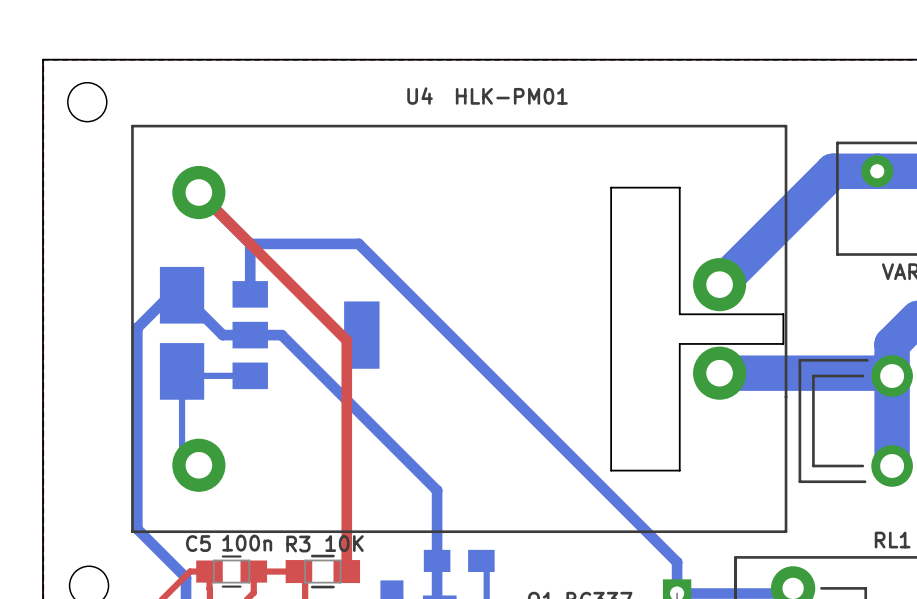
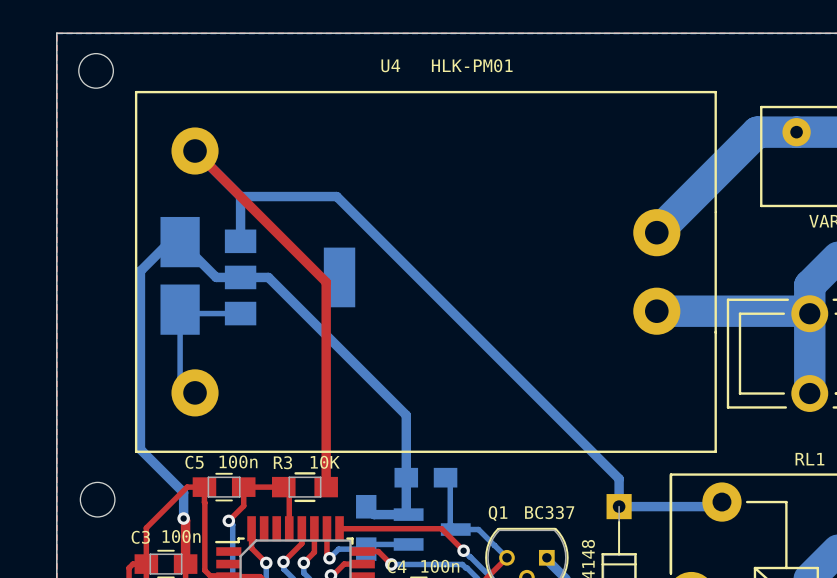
board edge: (679, 470) (611, 470) (611, 187) (679, 187) (679, 314) (783, 314) (783, 343) (679, 343) (679, 470) -> none

